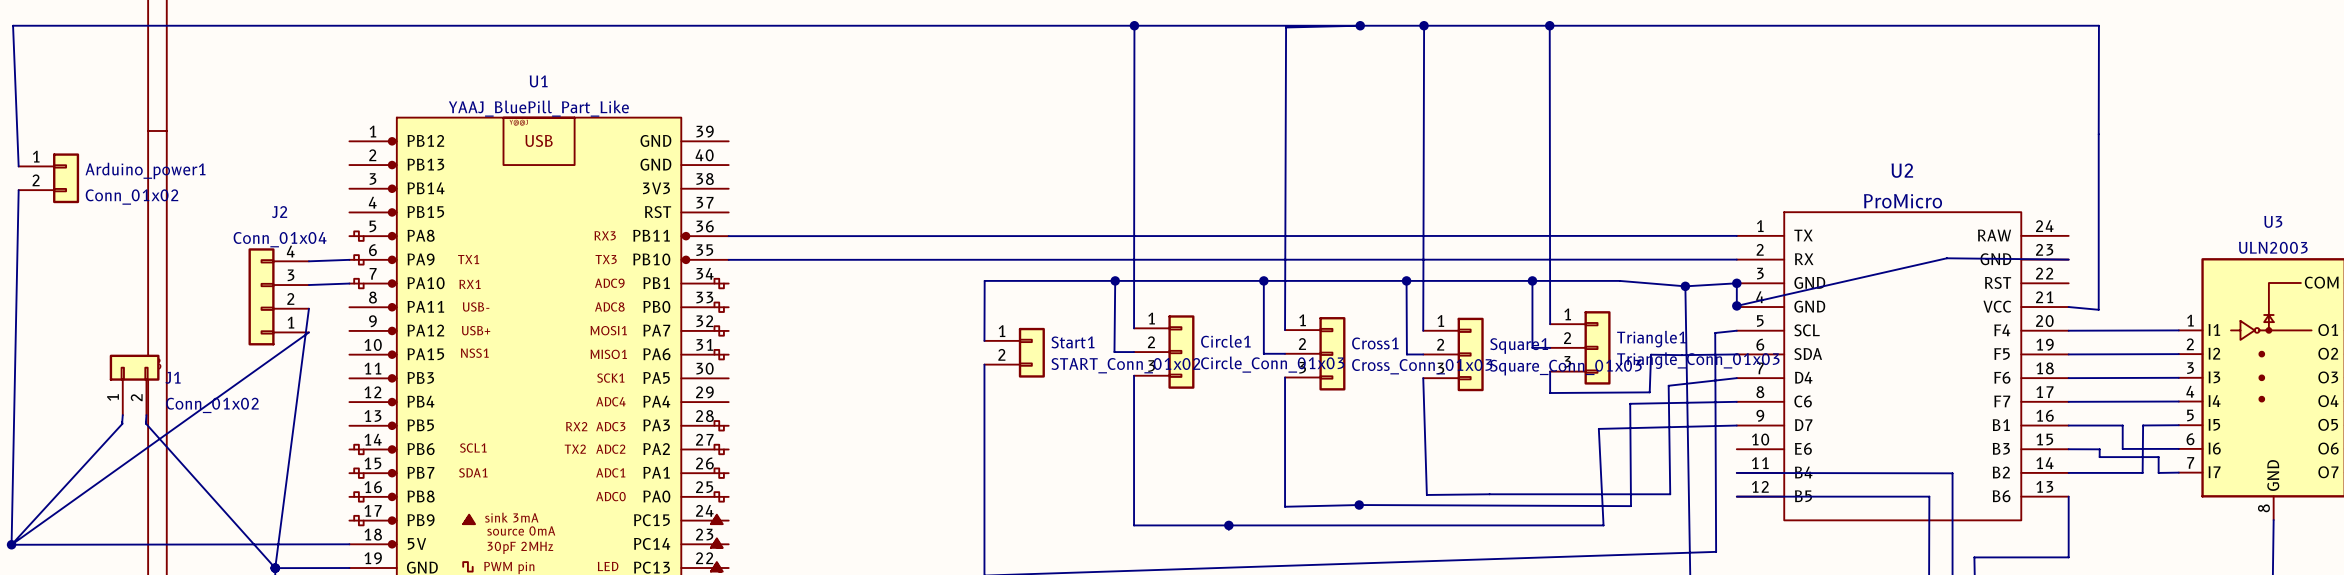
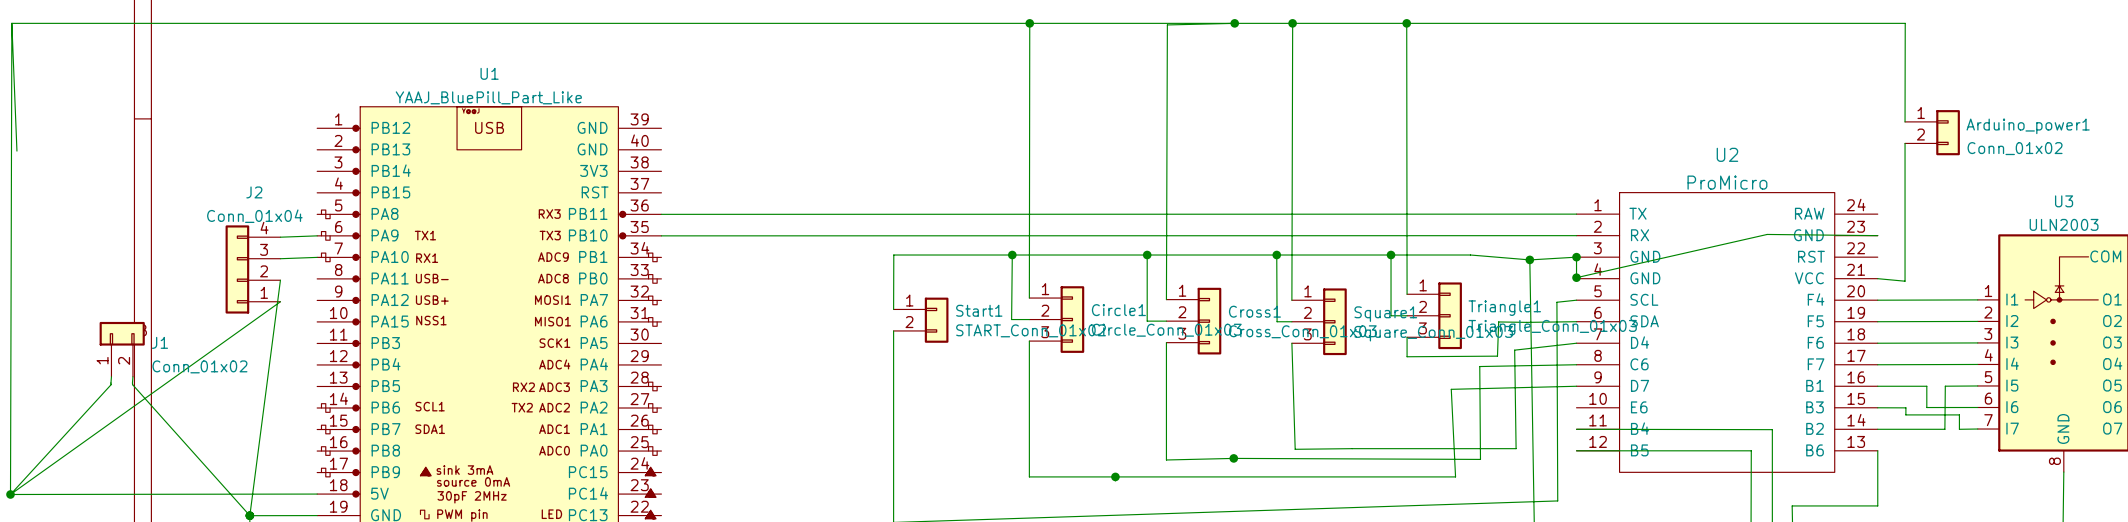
wire: (2098, 134) (2098, 158) -> none
Arduino_power1 position: (48, 178) -> (1932, 132)
wire: (18, 190) (11, 544) -> (11, 23) (10, 494)

